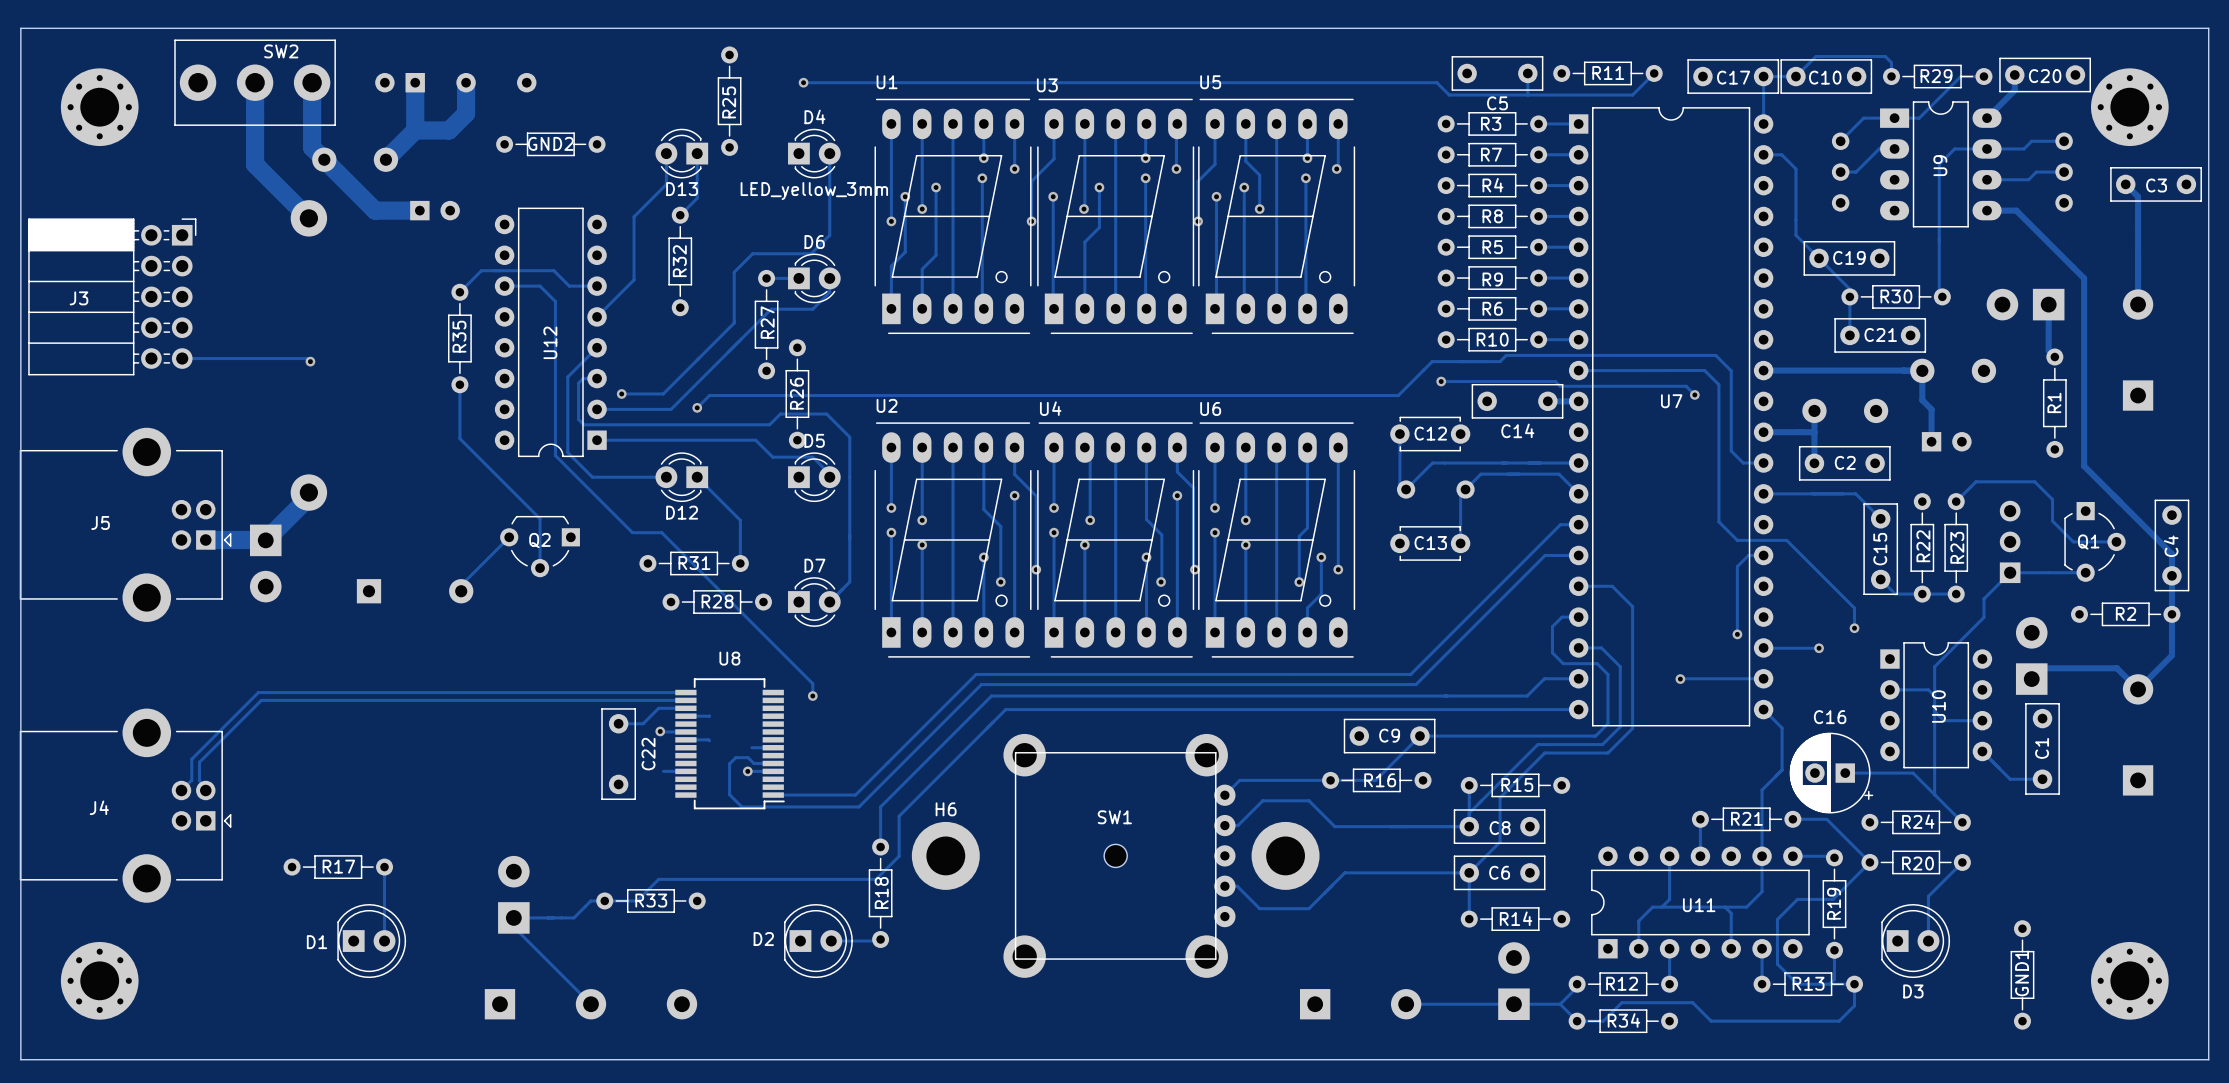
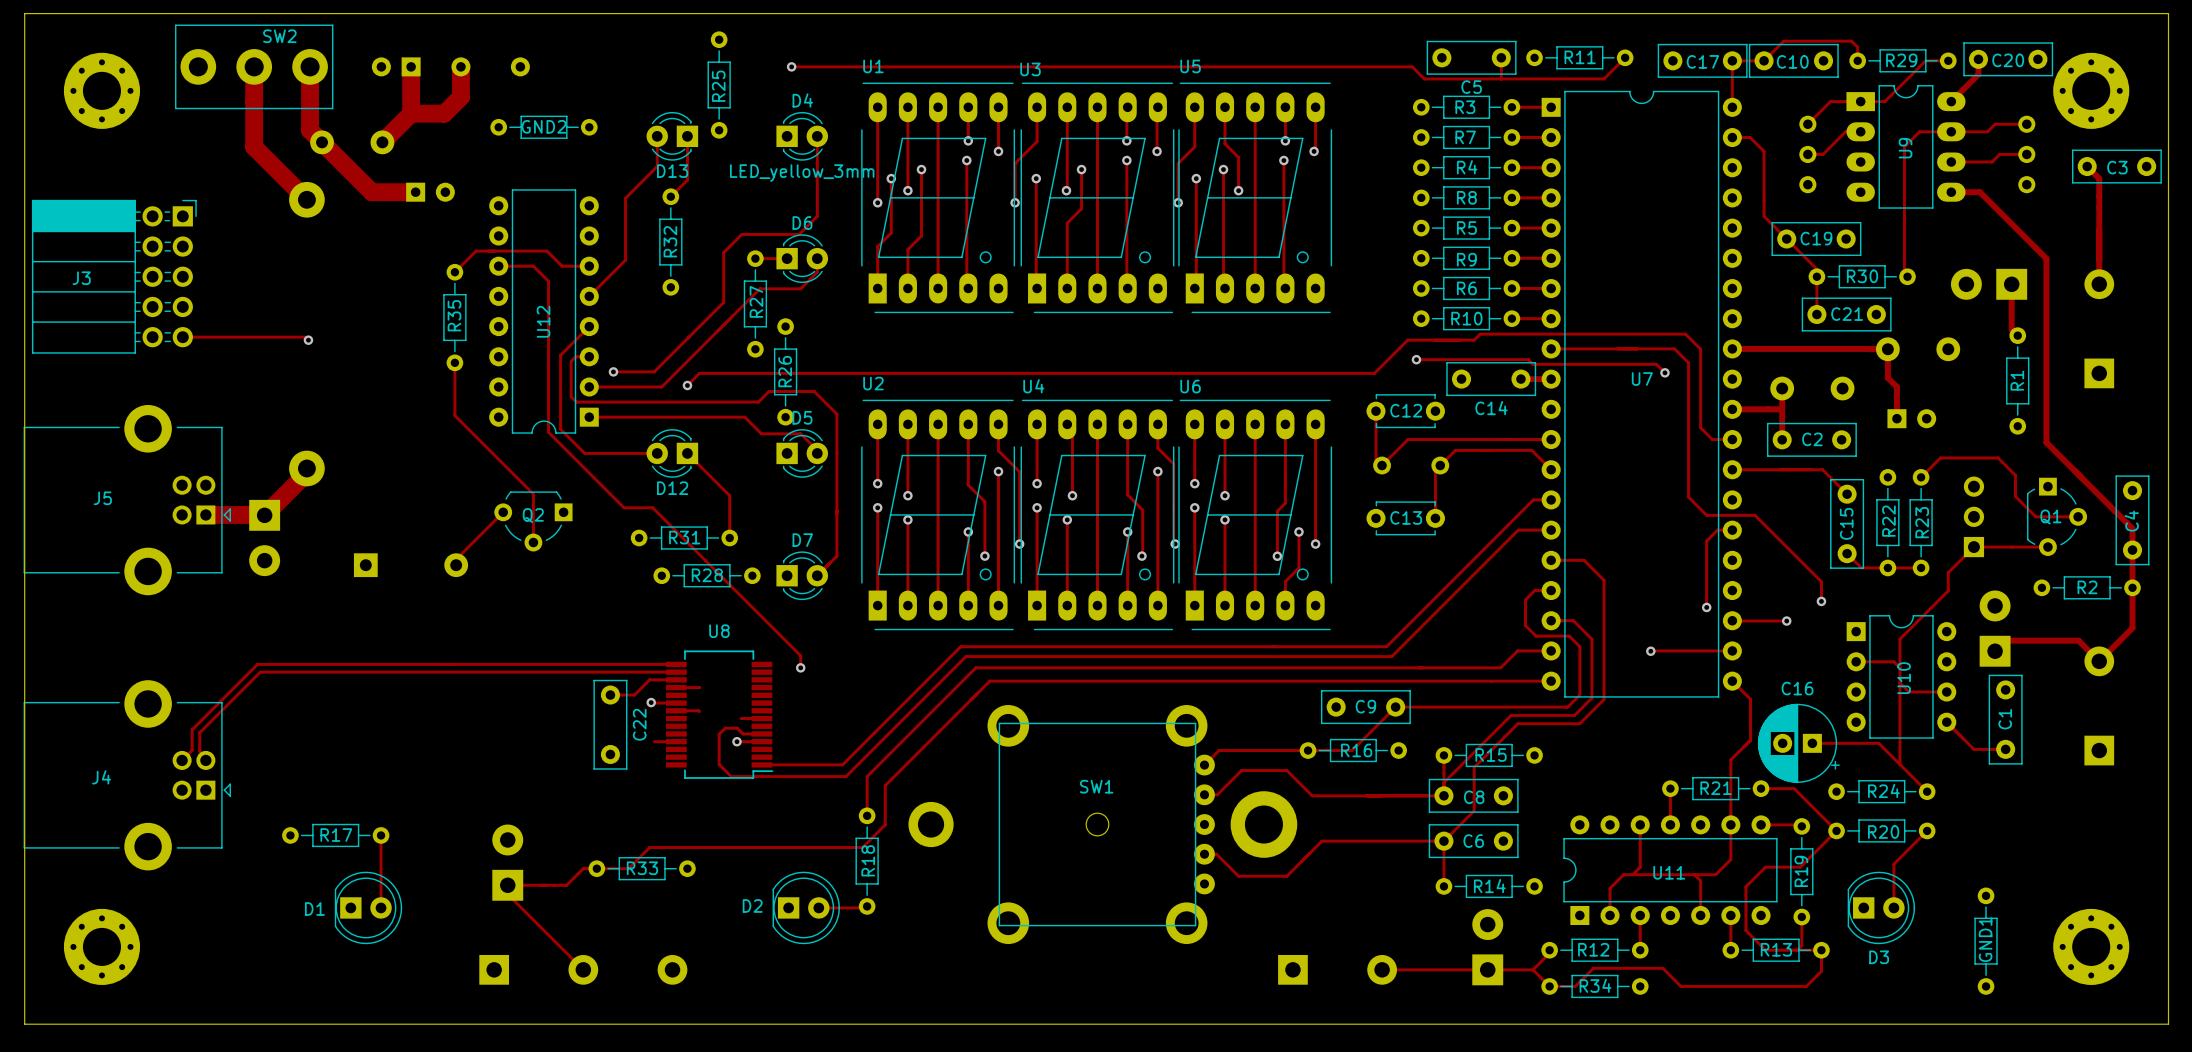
H6: (945, 855) -> none
part: none -> (931, 824)

